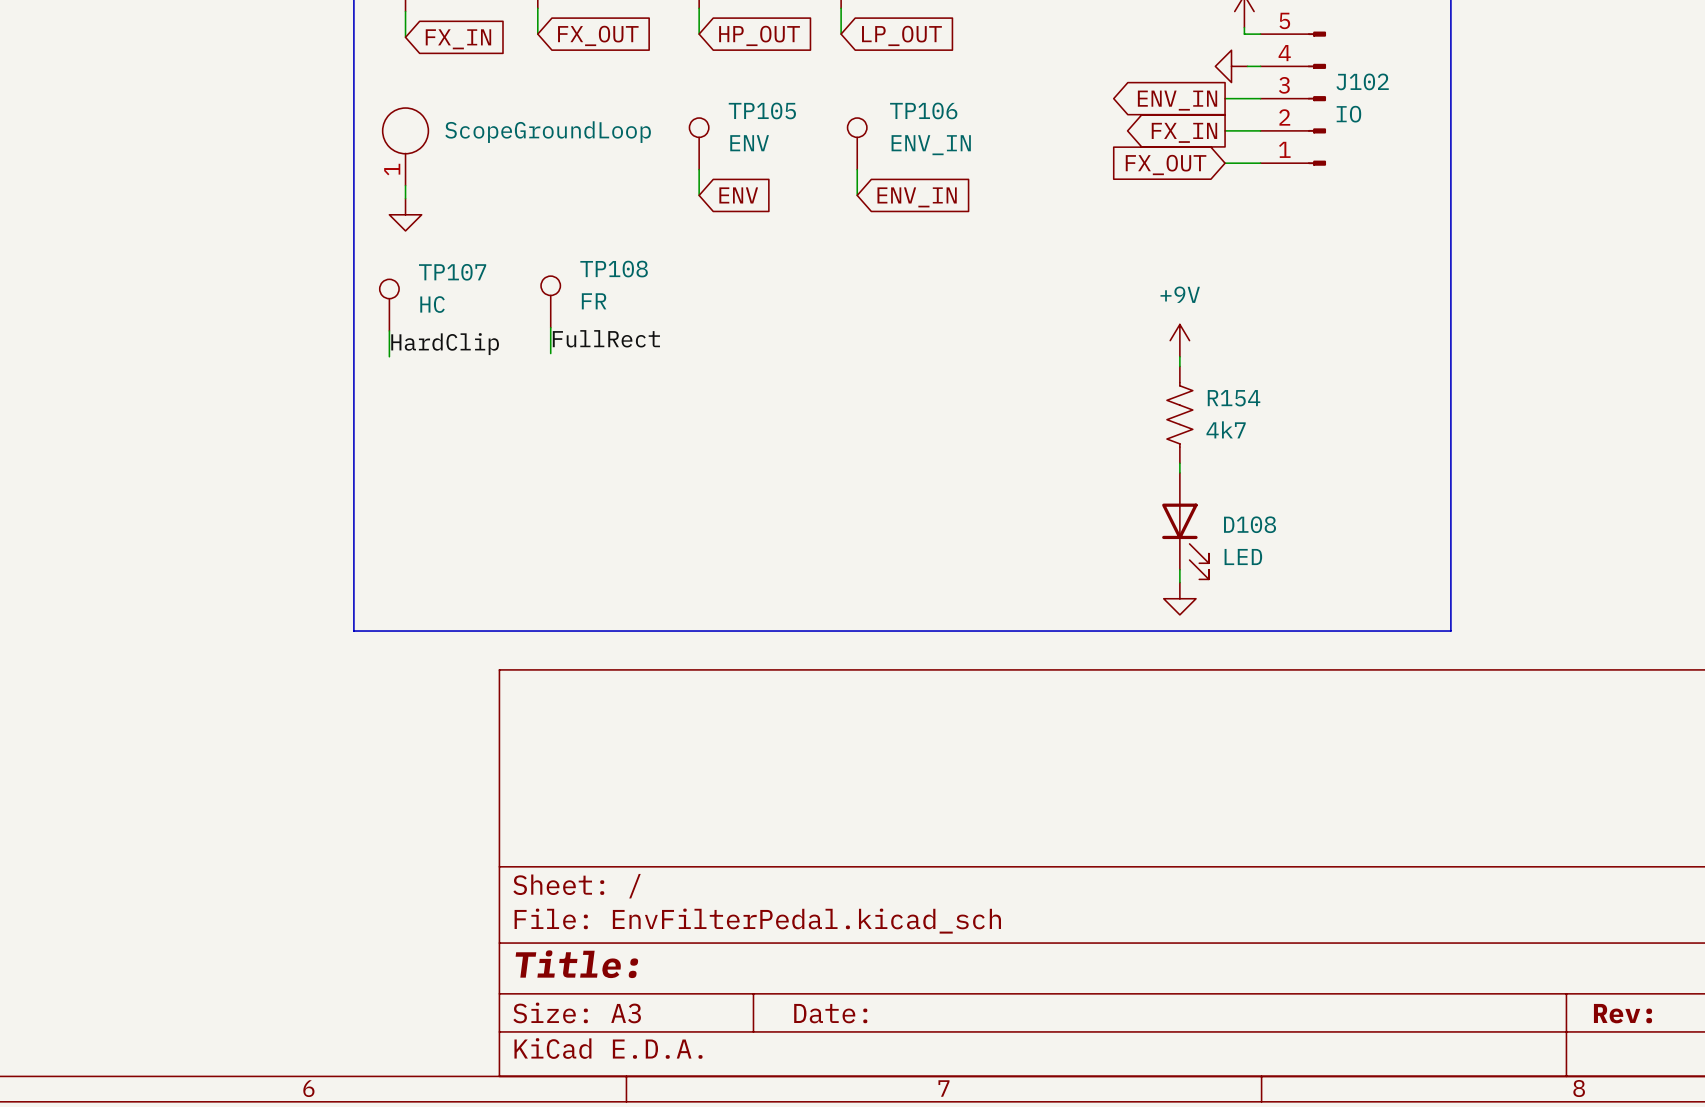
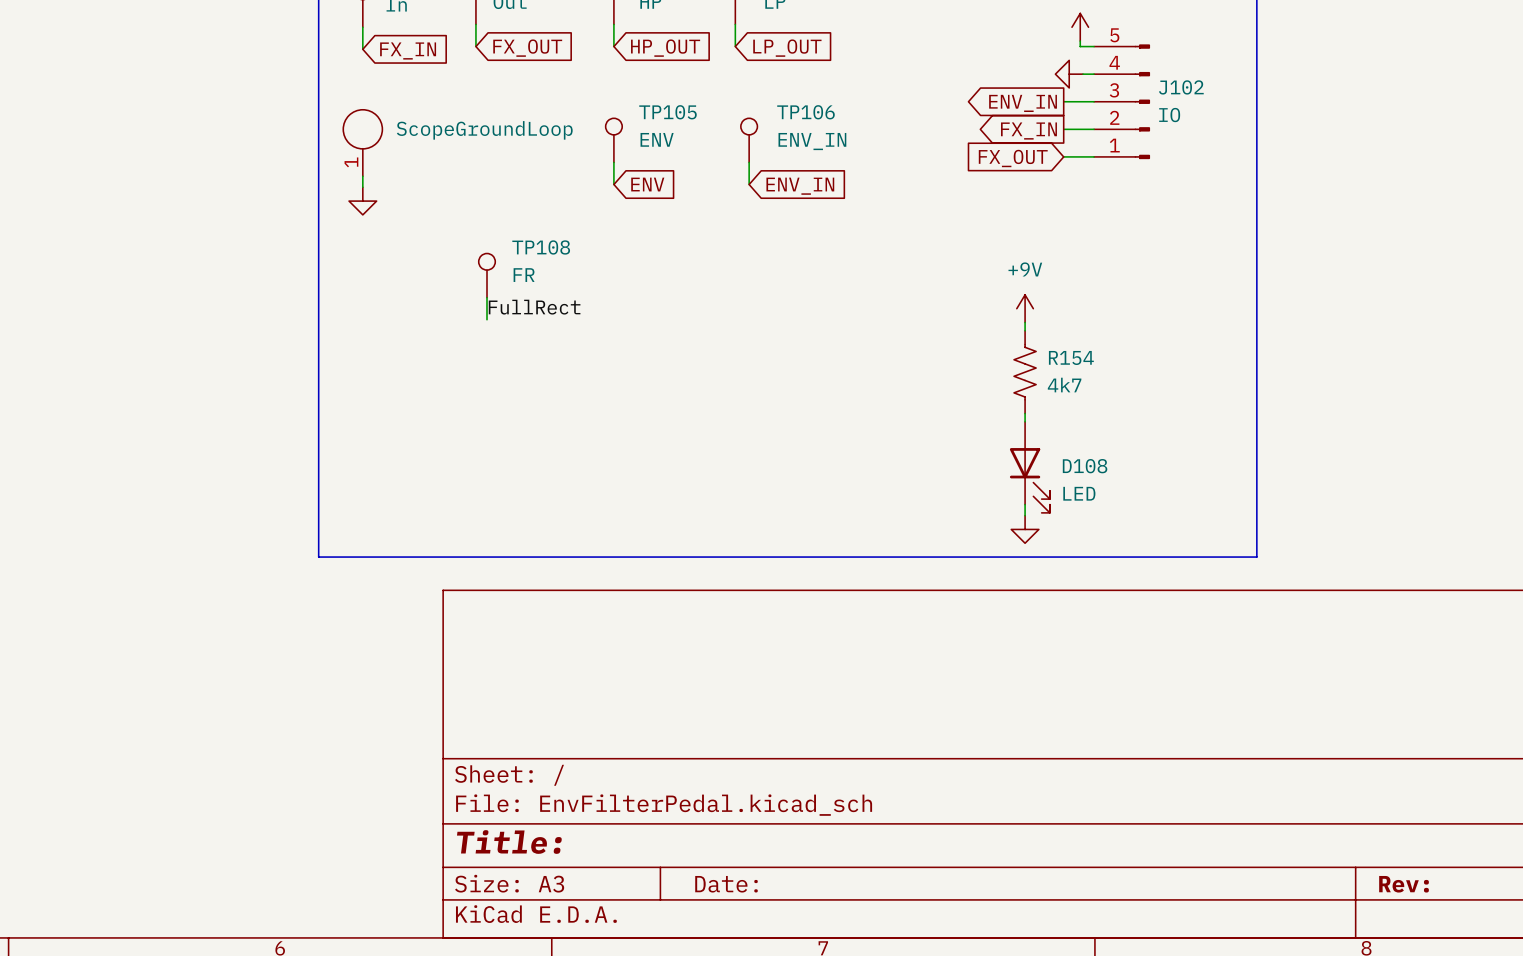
TP107: HC (389, 305) -> none
wire: (389, 330) (389, 356) -> none
label: HardClip (445, 344) -> none

